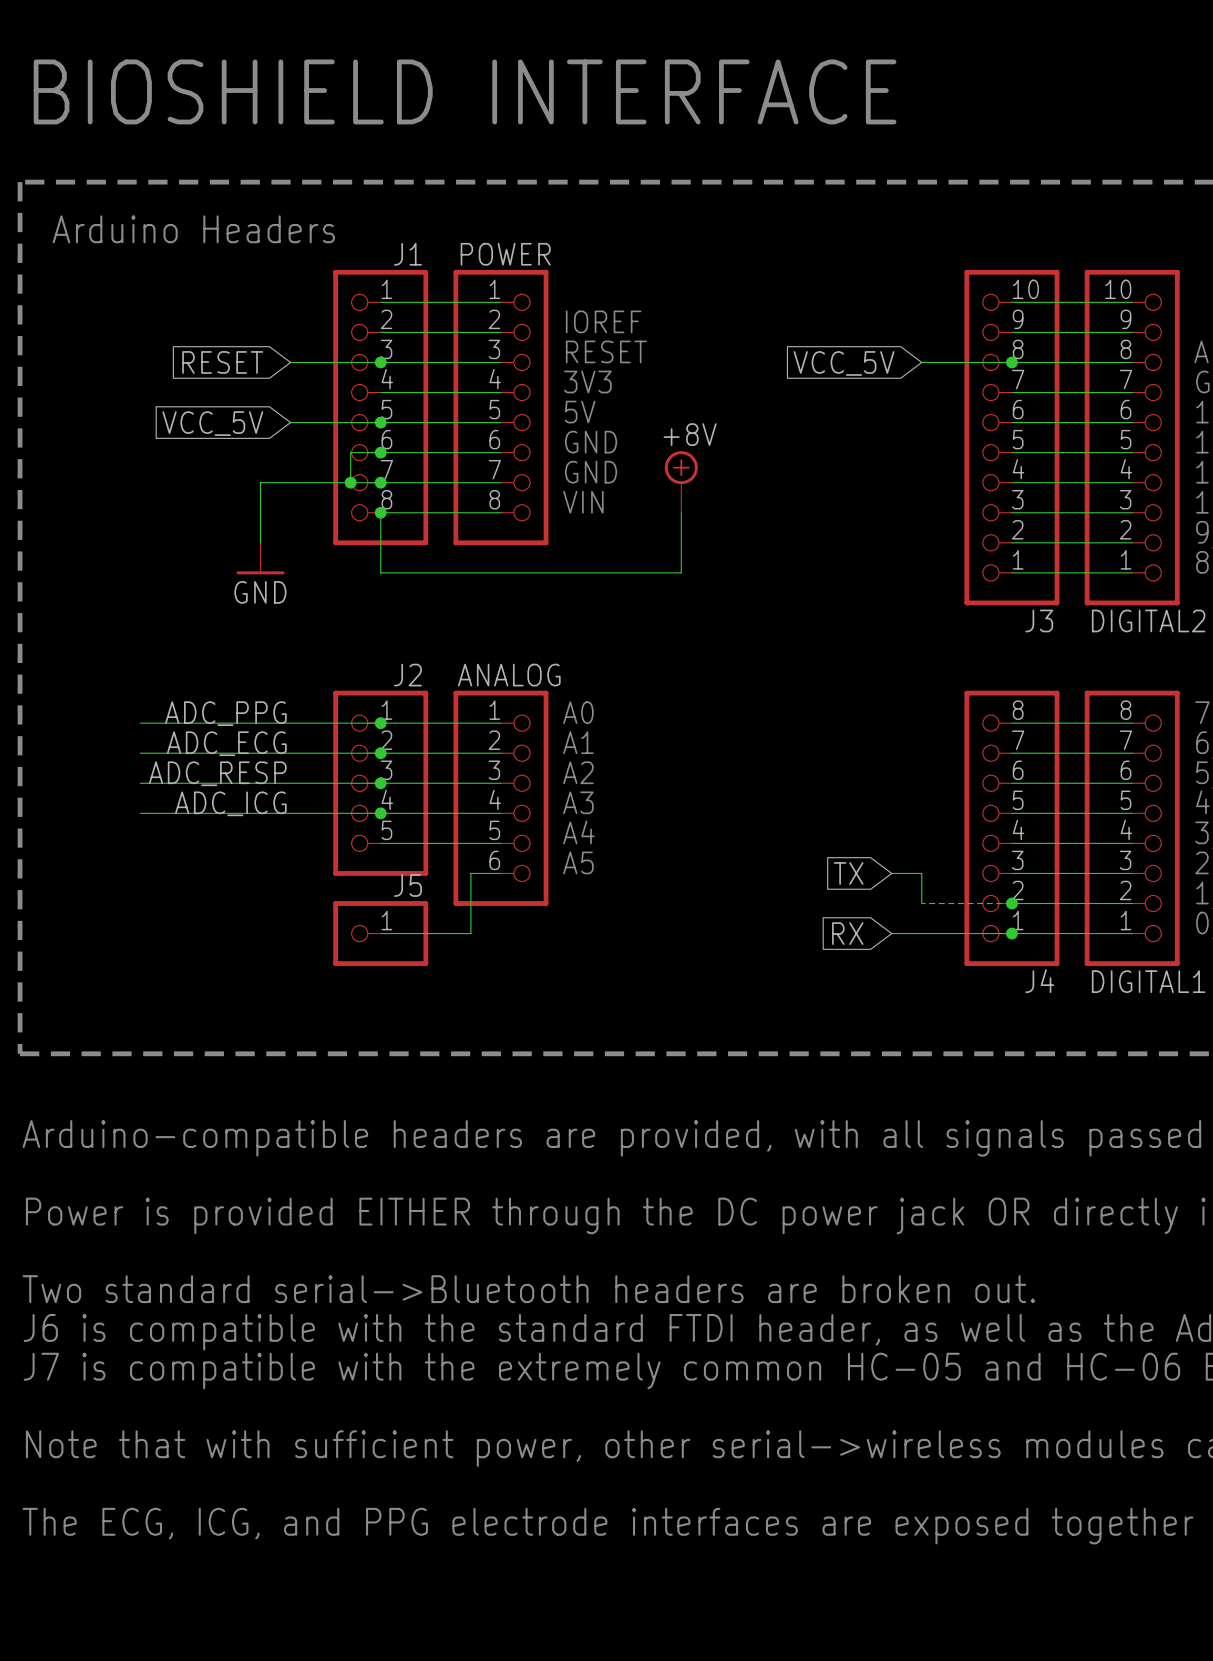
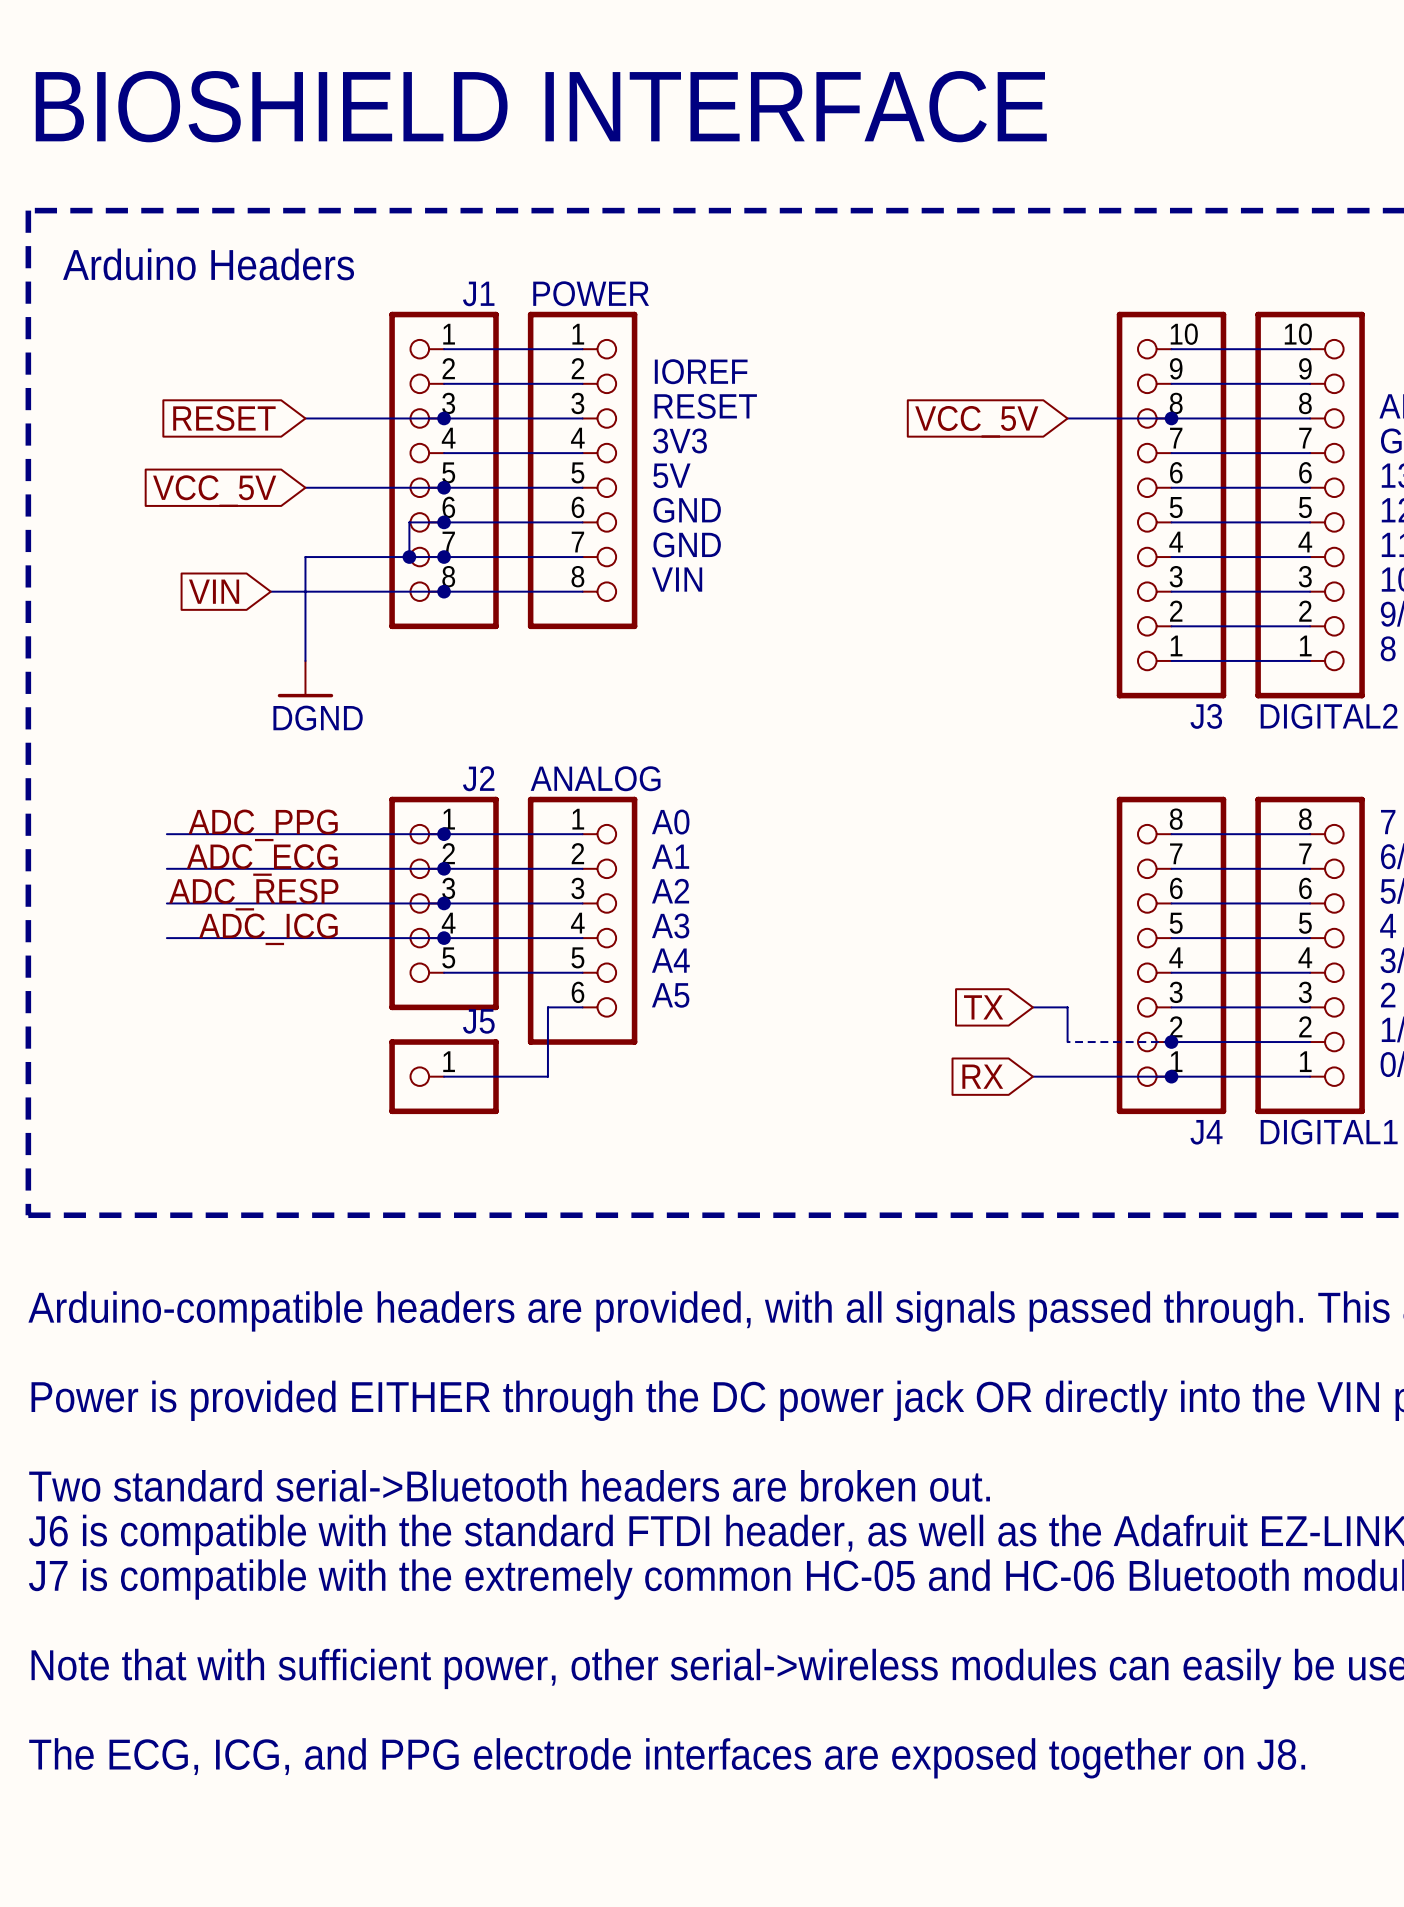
global label position: RESET (222, 362) -> RESET (224, 418)
wire: none -> (305, 418) (340, 418)
wire: none -> (305, 487) (340, 487)
global label position: VCC_5V (212, 423) -> VCC_5V (214, 491)
power symbol: +8V (681, 481) -> none
global label: none -> VIN (214, 591)
wire: (380, 512) (380, 572) (681, 572) (681, 512) -> (444, 591) (270, 591)
power symbol: GND (260, 558) -> none
power symbol: none -> DGND (305, 679)

